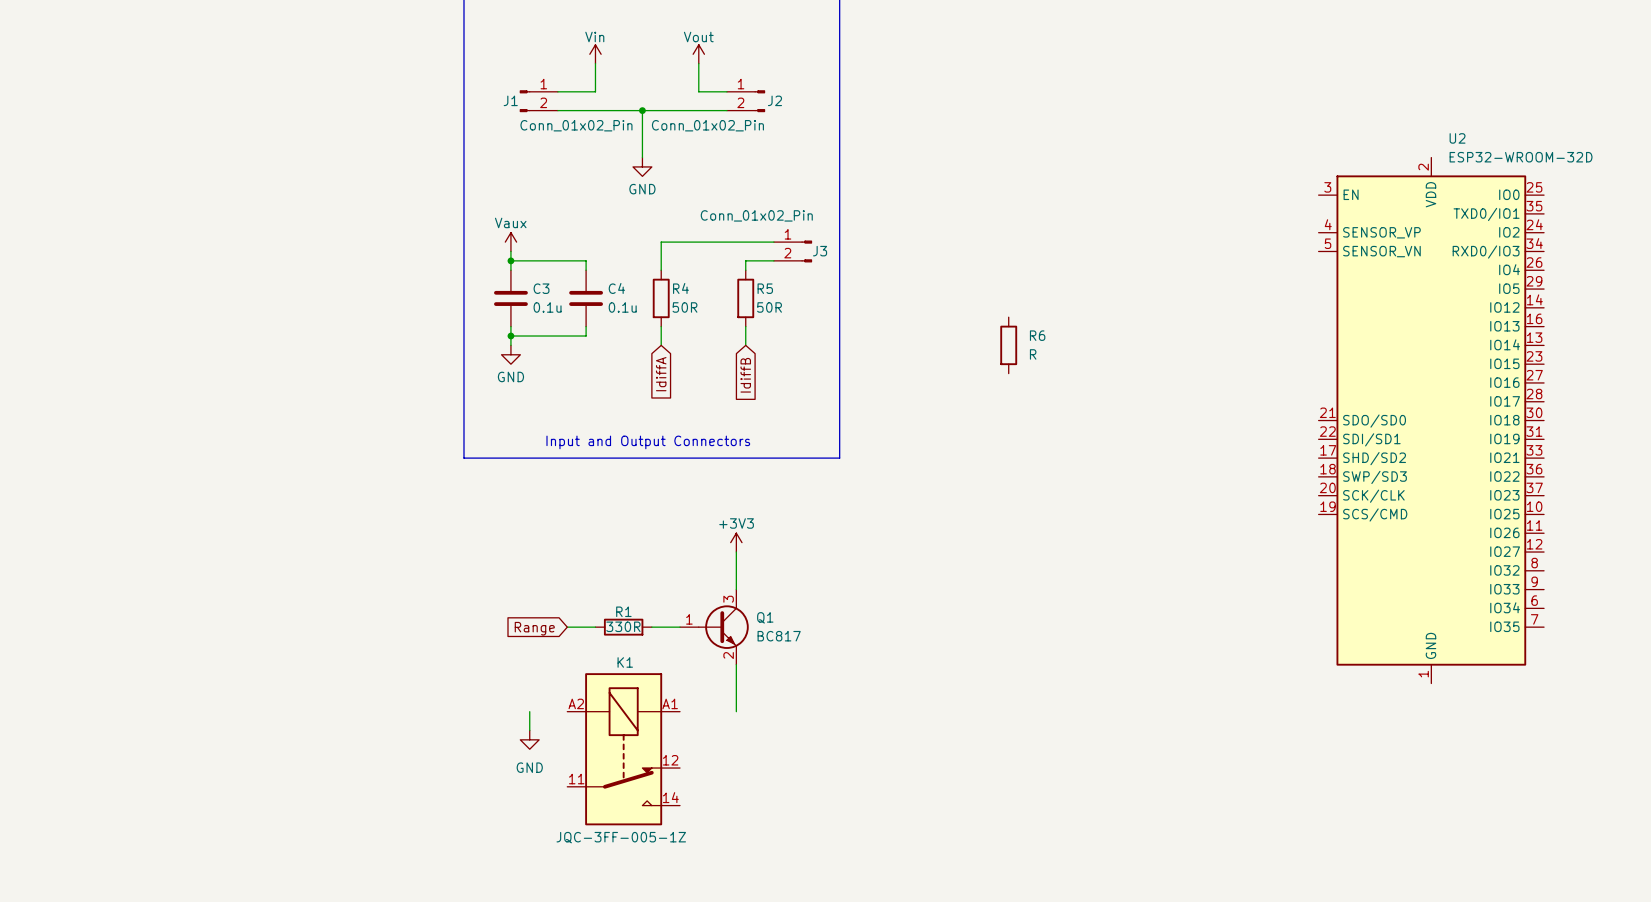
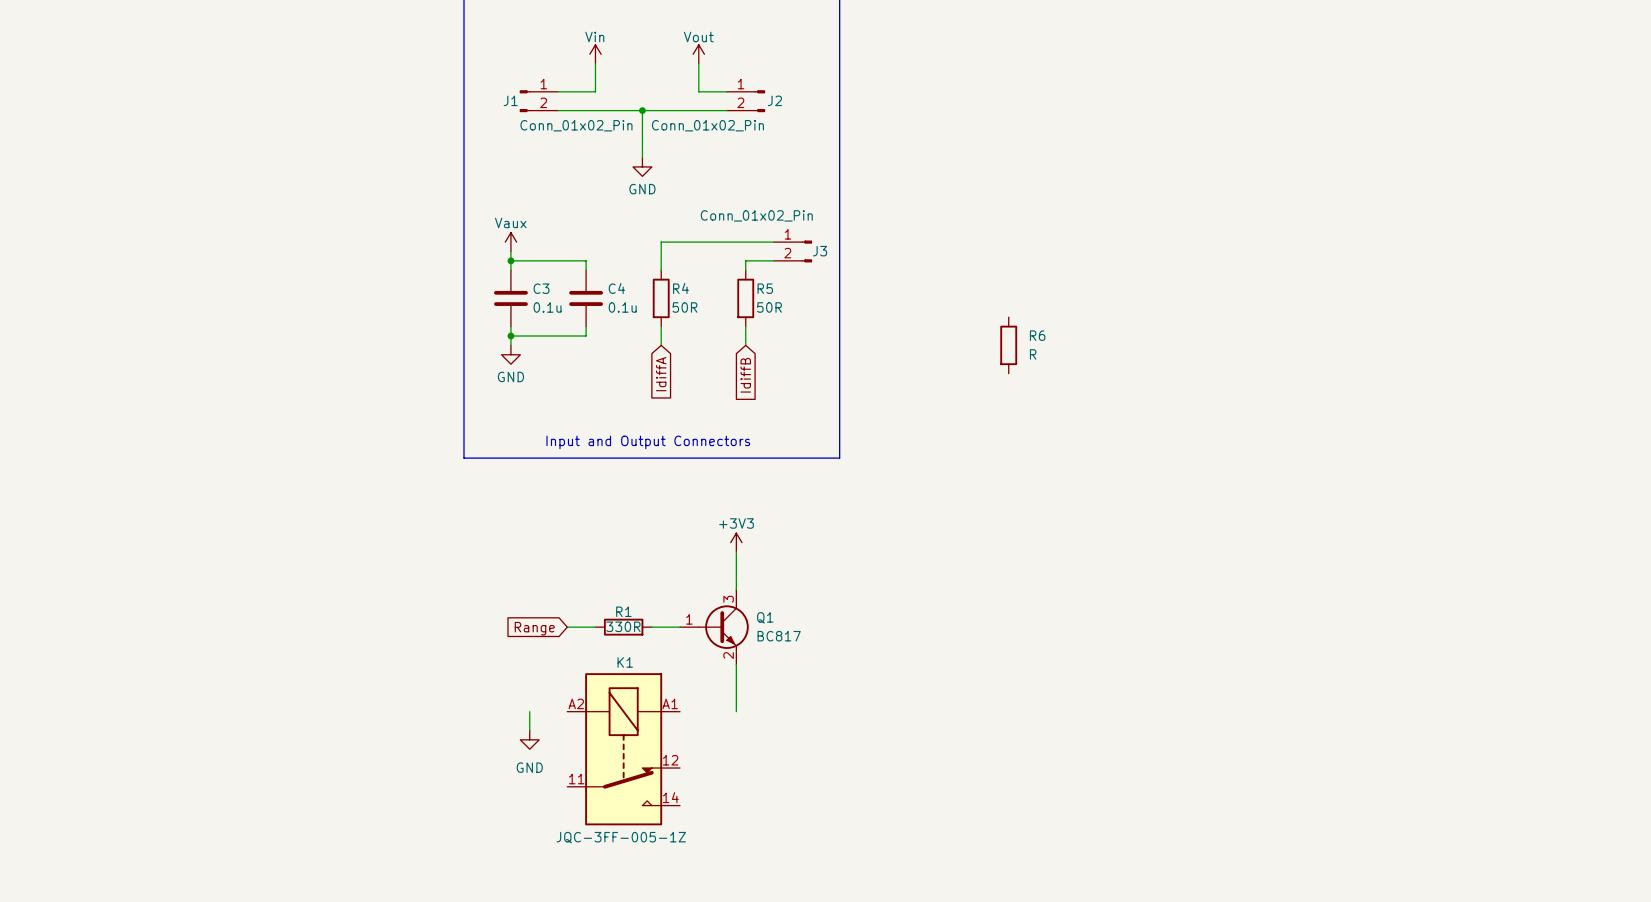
U2: ESP32-WROOM-32D (1431, 420) -> none

